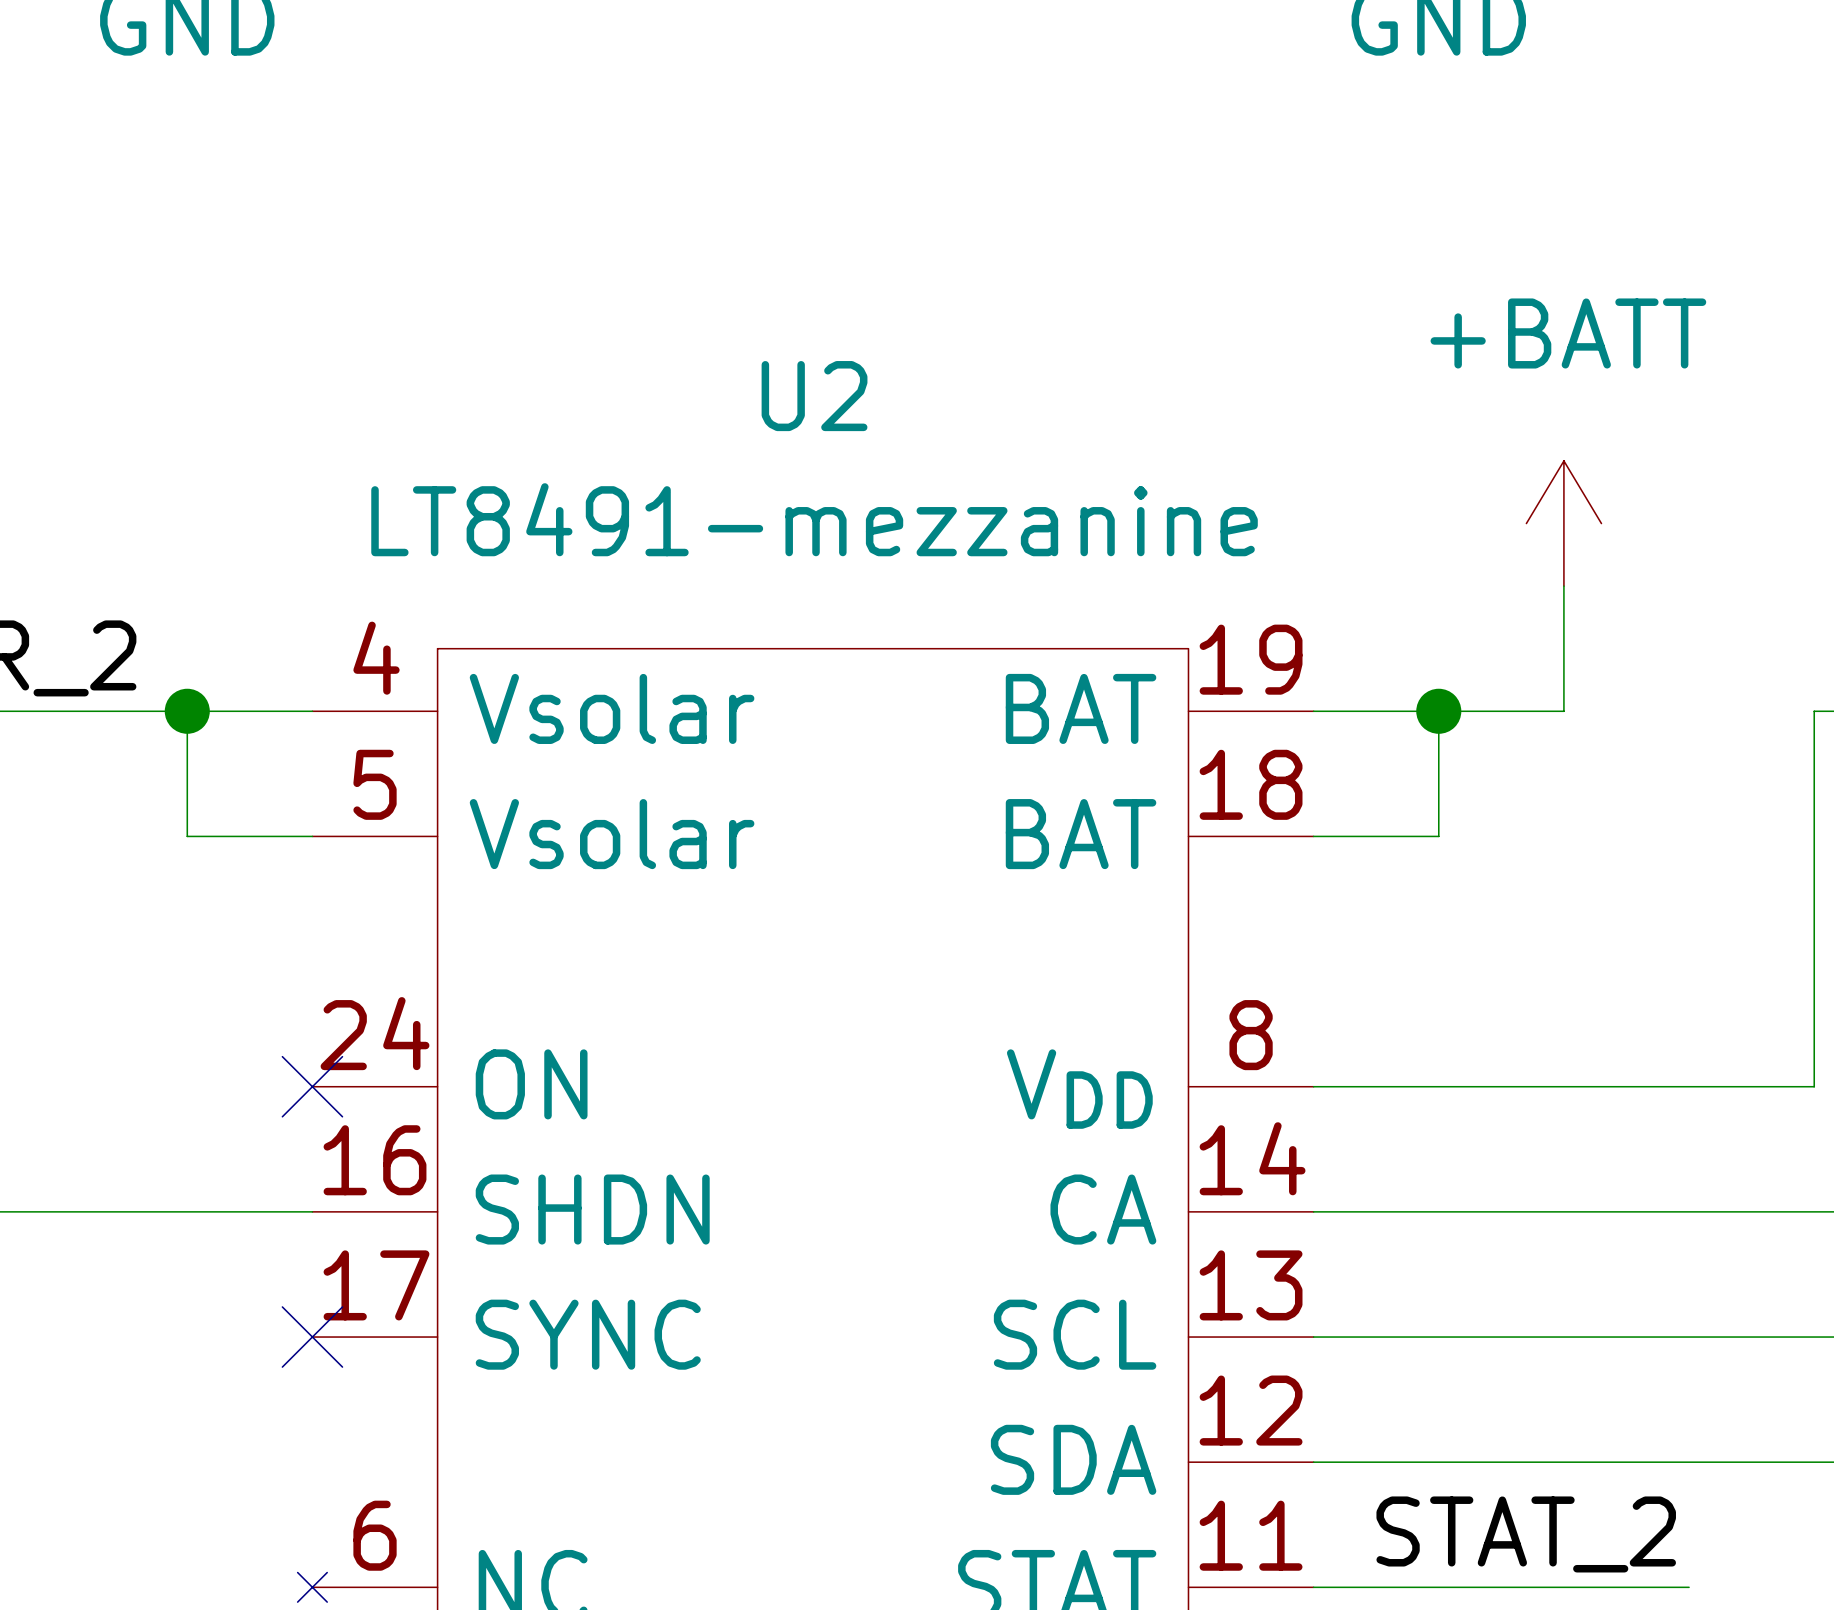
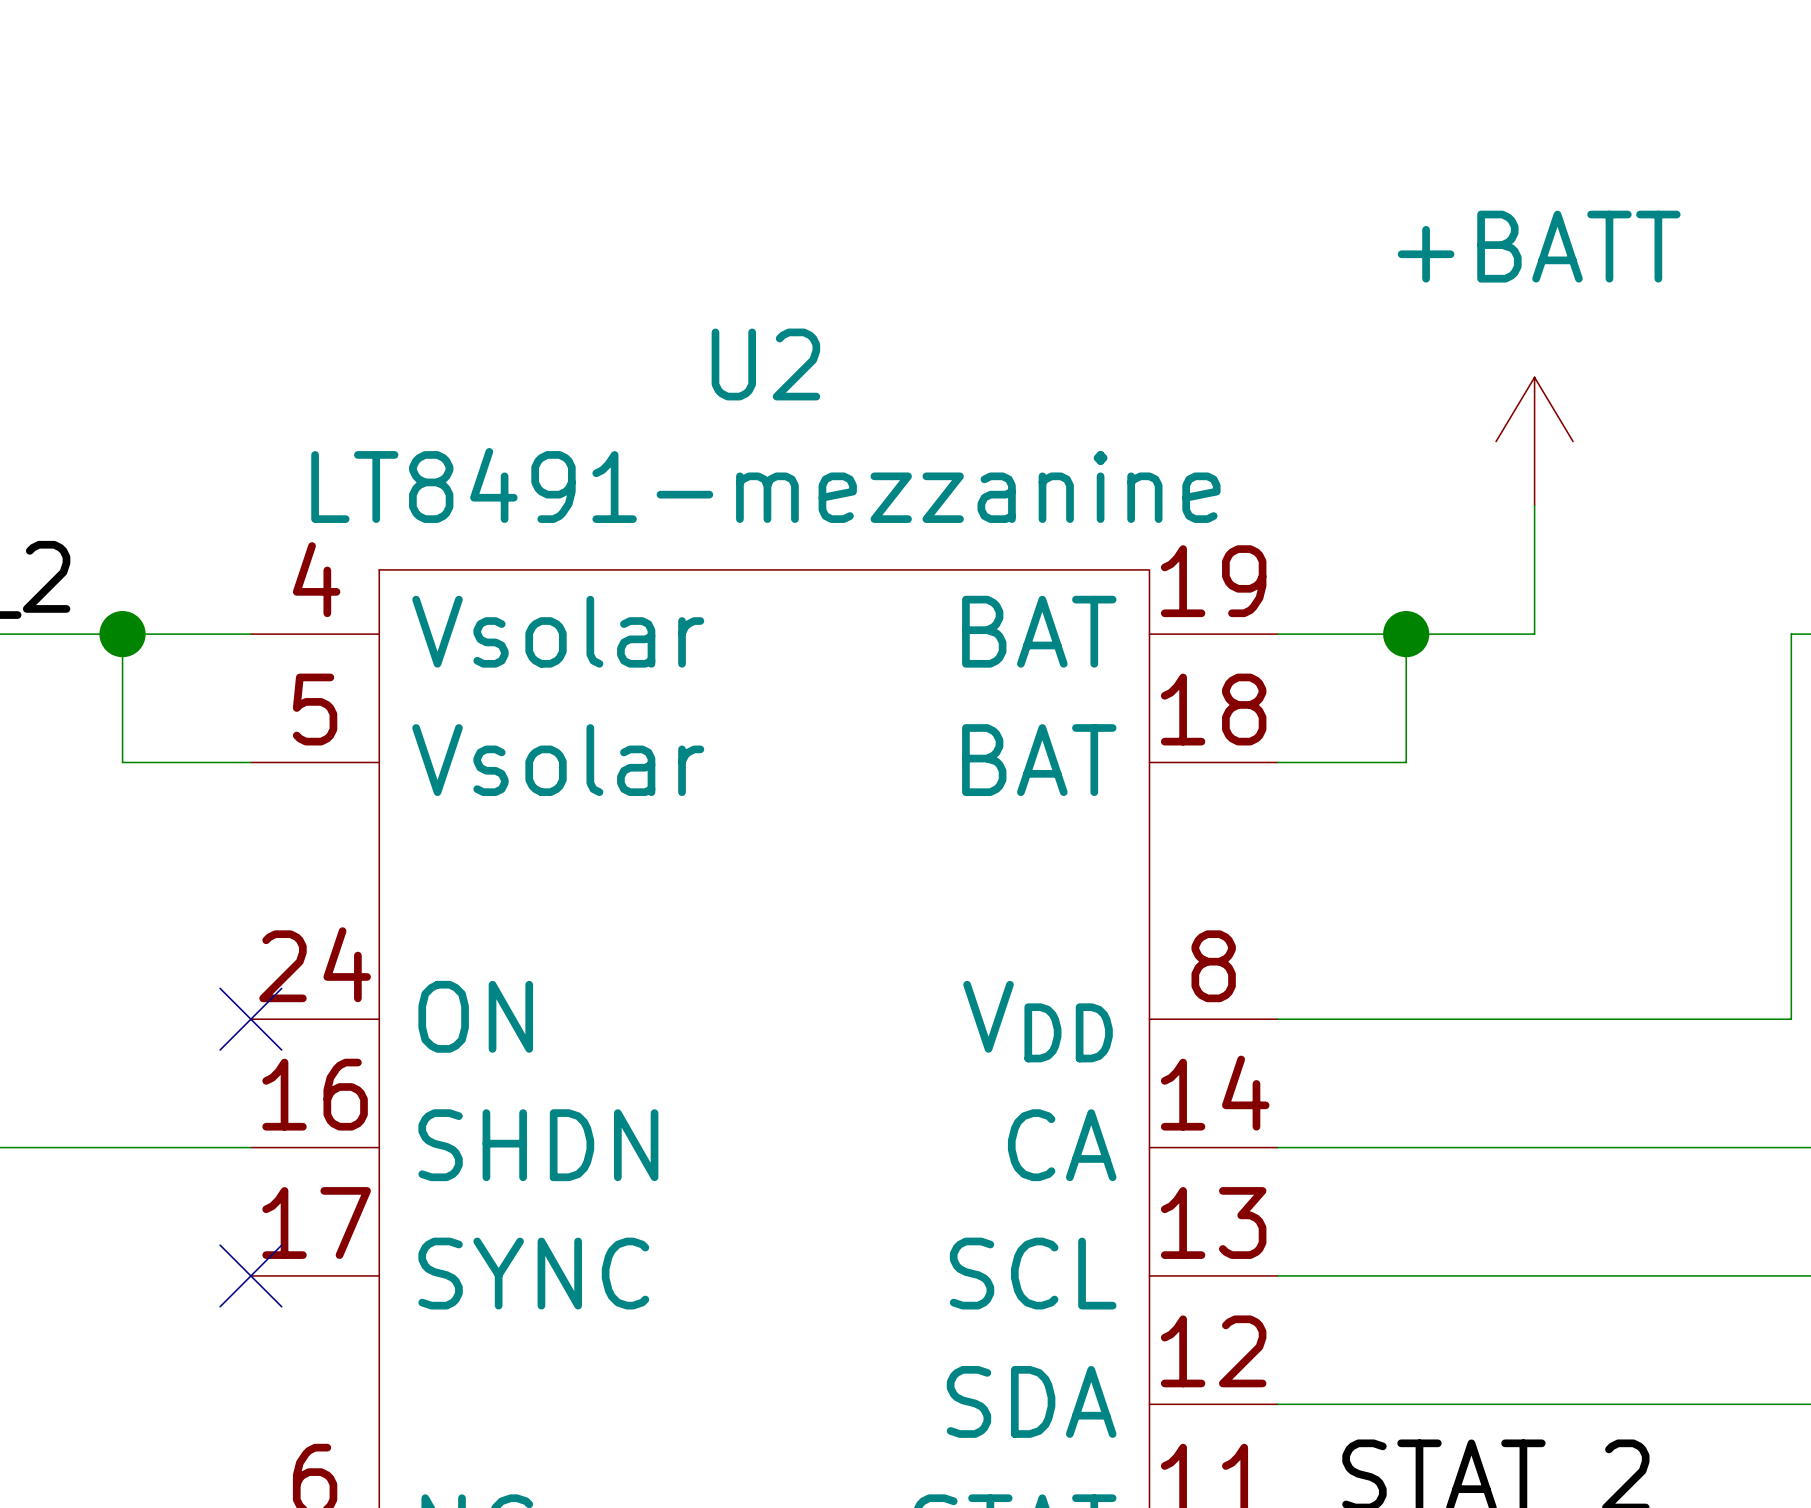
U2 name position: U2 (814, 396) -> U2 (765, 364)
U2 value position: LT8491-mezzanine (814, 519) -> LT8491-mezzanine (765, 485)

